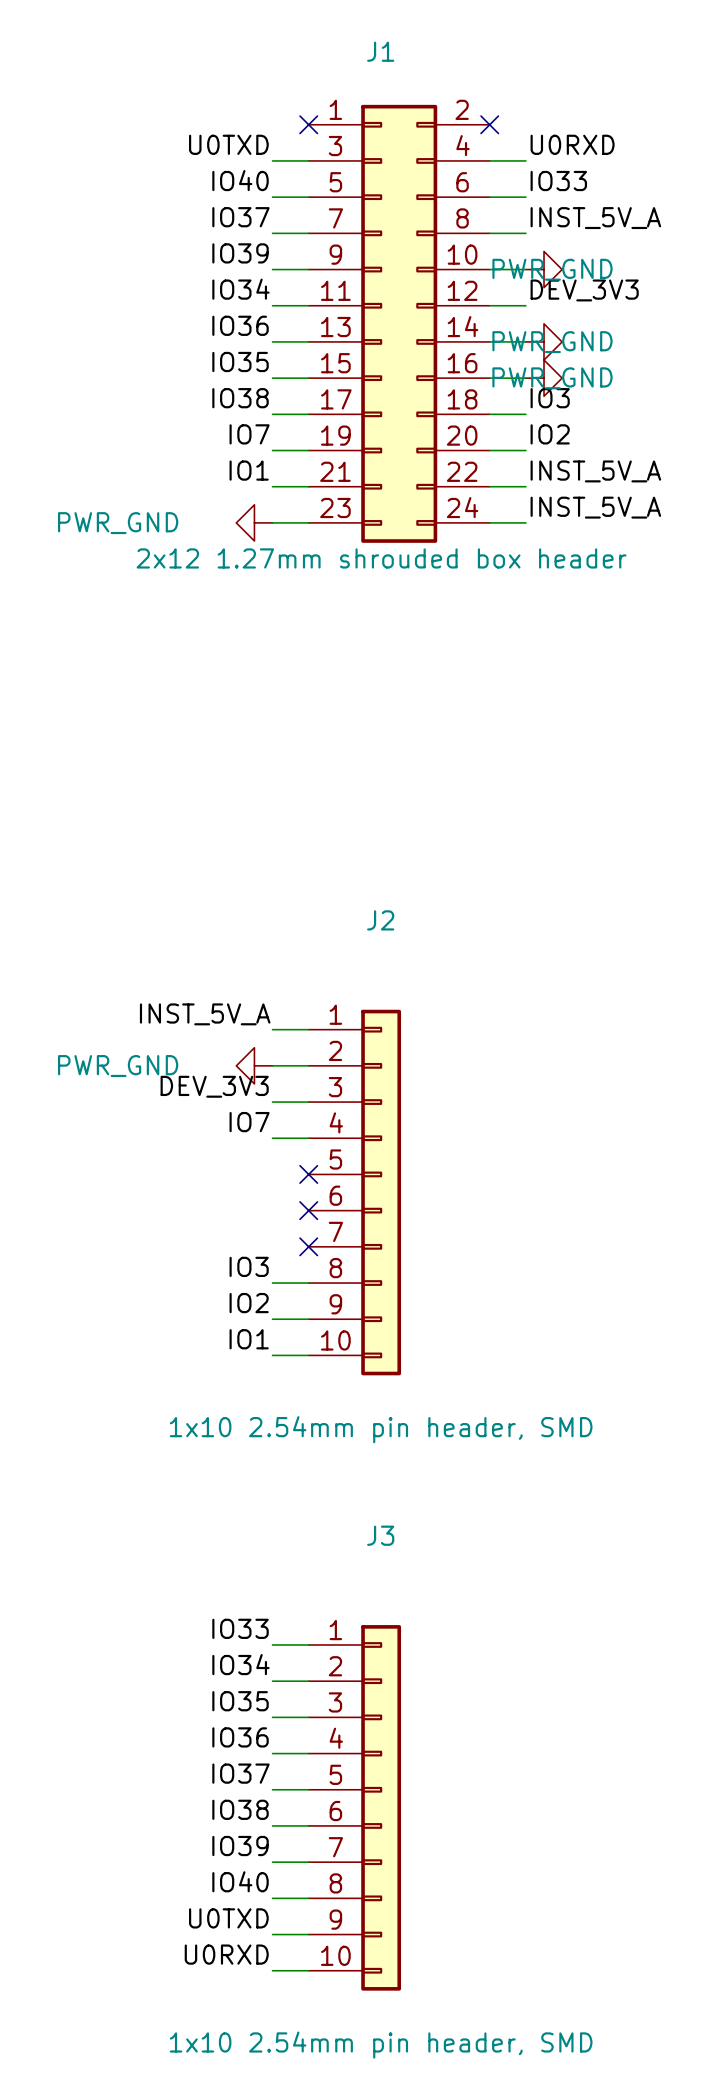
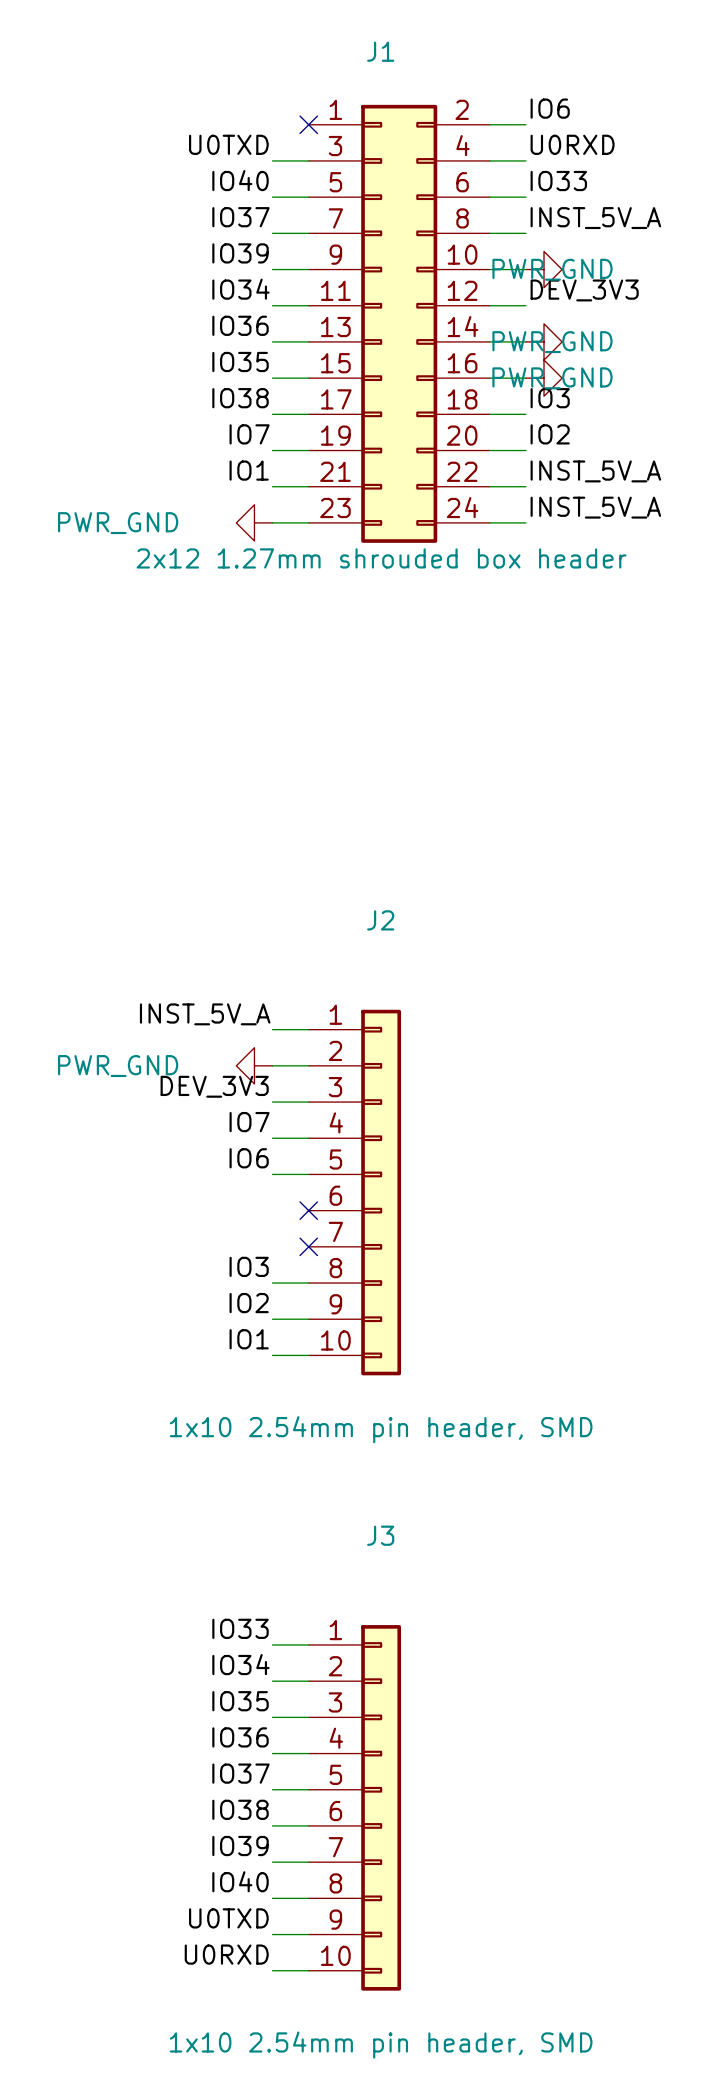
label: none -> IO6 (550, 108)
wire: none -> (489, 124) (525, 124)
no-connect mark: (489, 124) -> none
label: none -> IO6 (249, 1158)
wire: none -> (272, 1174) (308, 1174)
no-connect mark: (308, 1174) -> none

